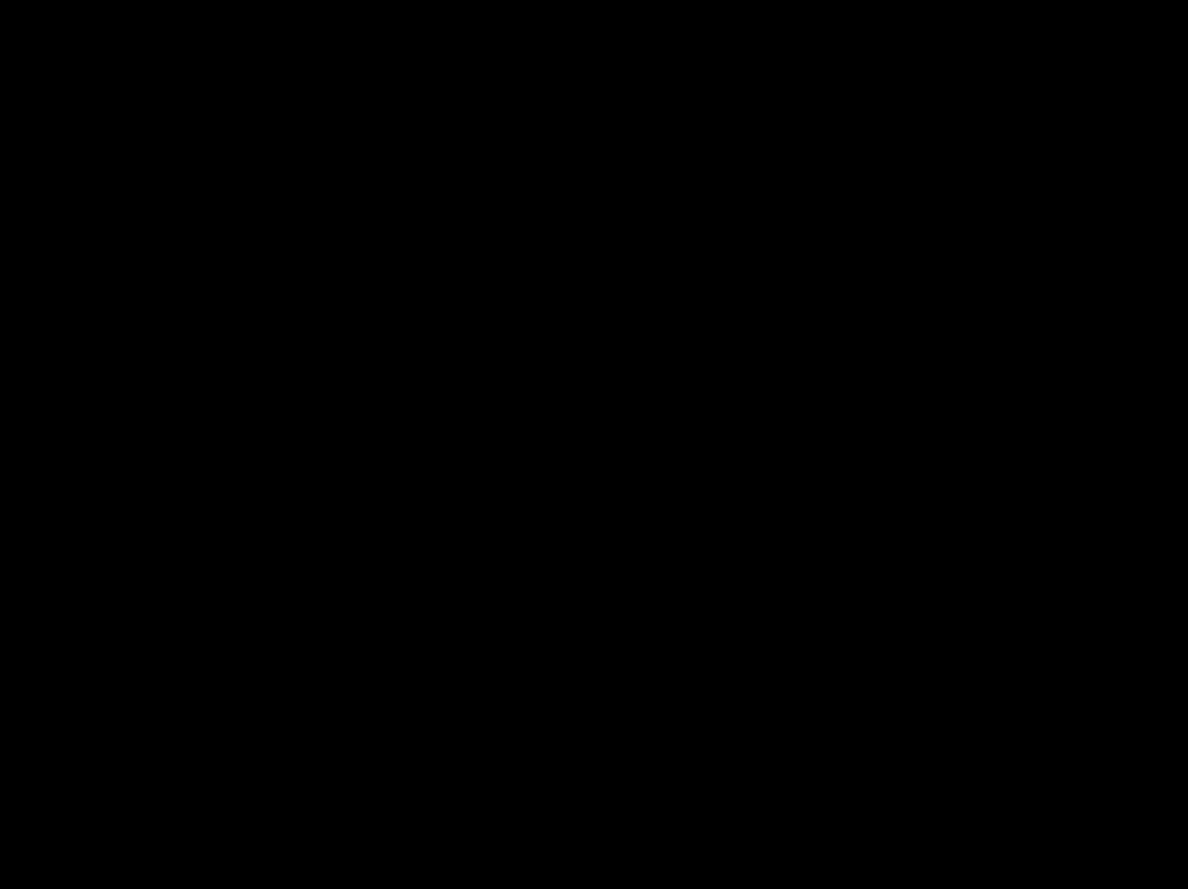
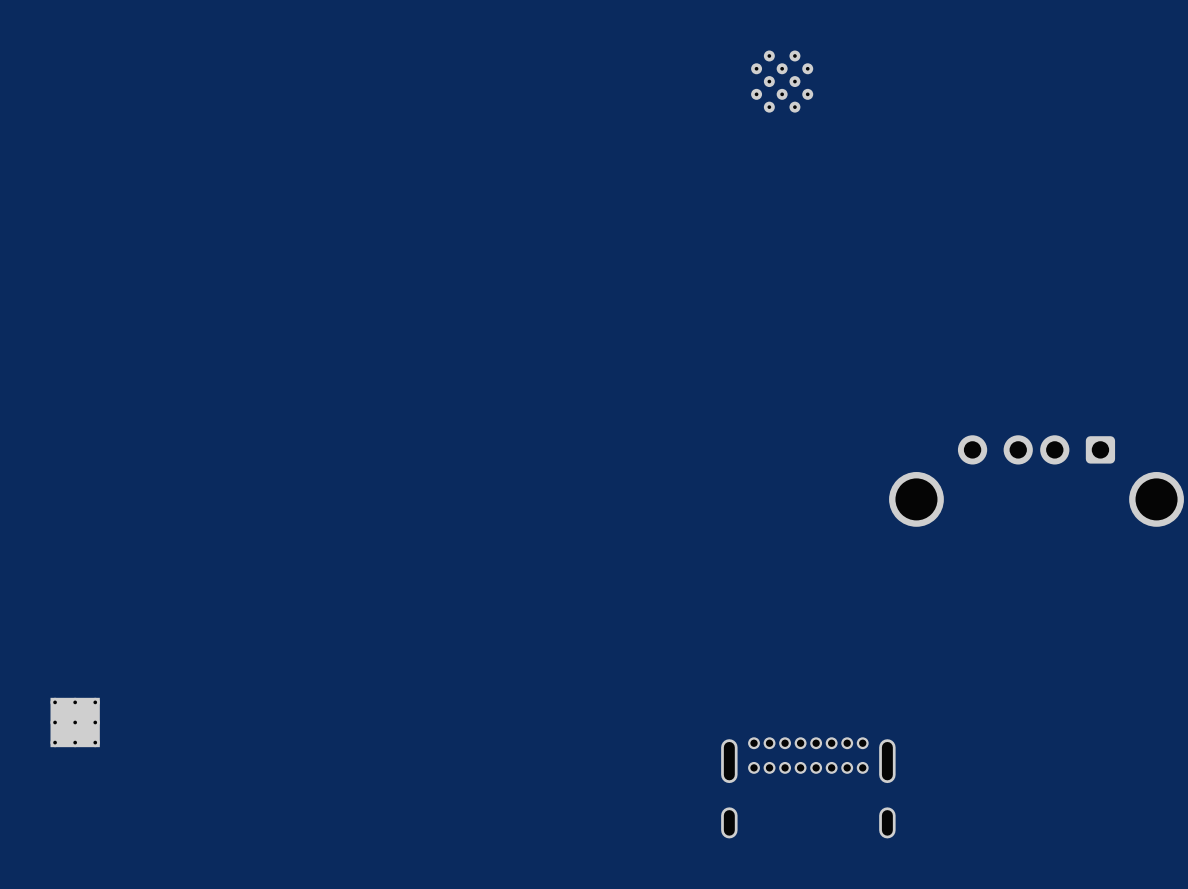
part: none -> (782, 81)
part: none -> (1036, 481)
part: none -> (75, 722)
part: none -> (808, 787)

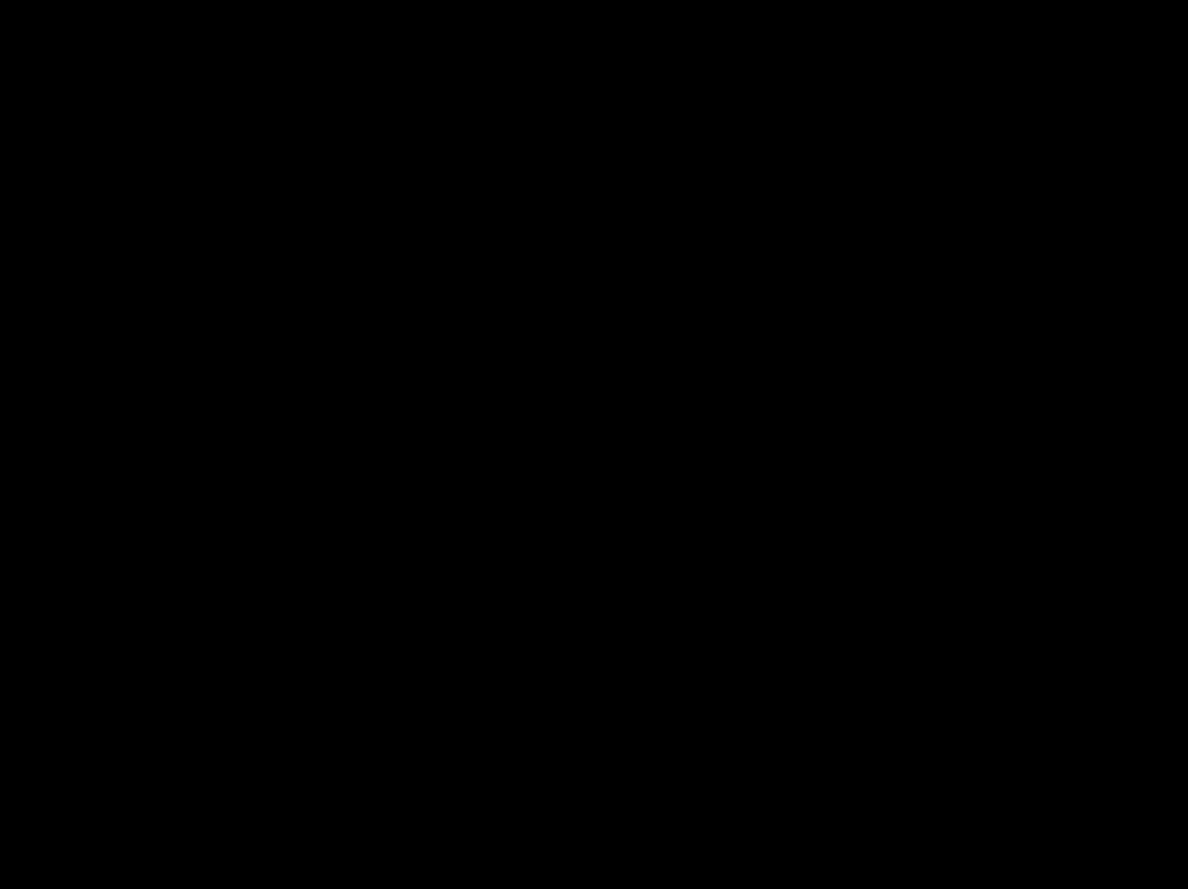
part: (782, 81) -> none
part: (1036, 481) -> none
part: (75, 722) -> none
part: (808, 787) -> none

